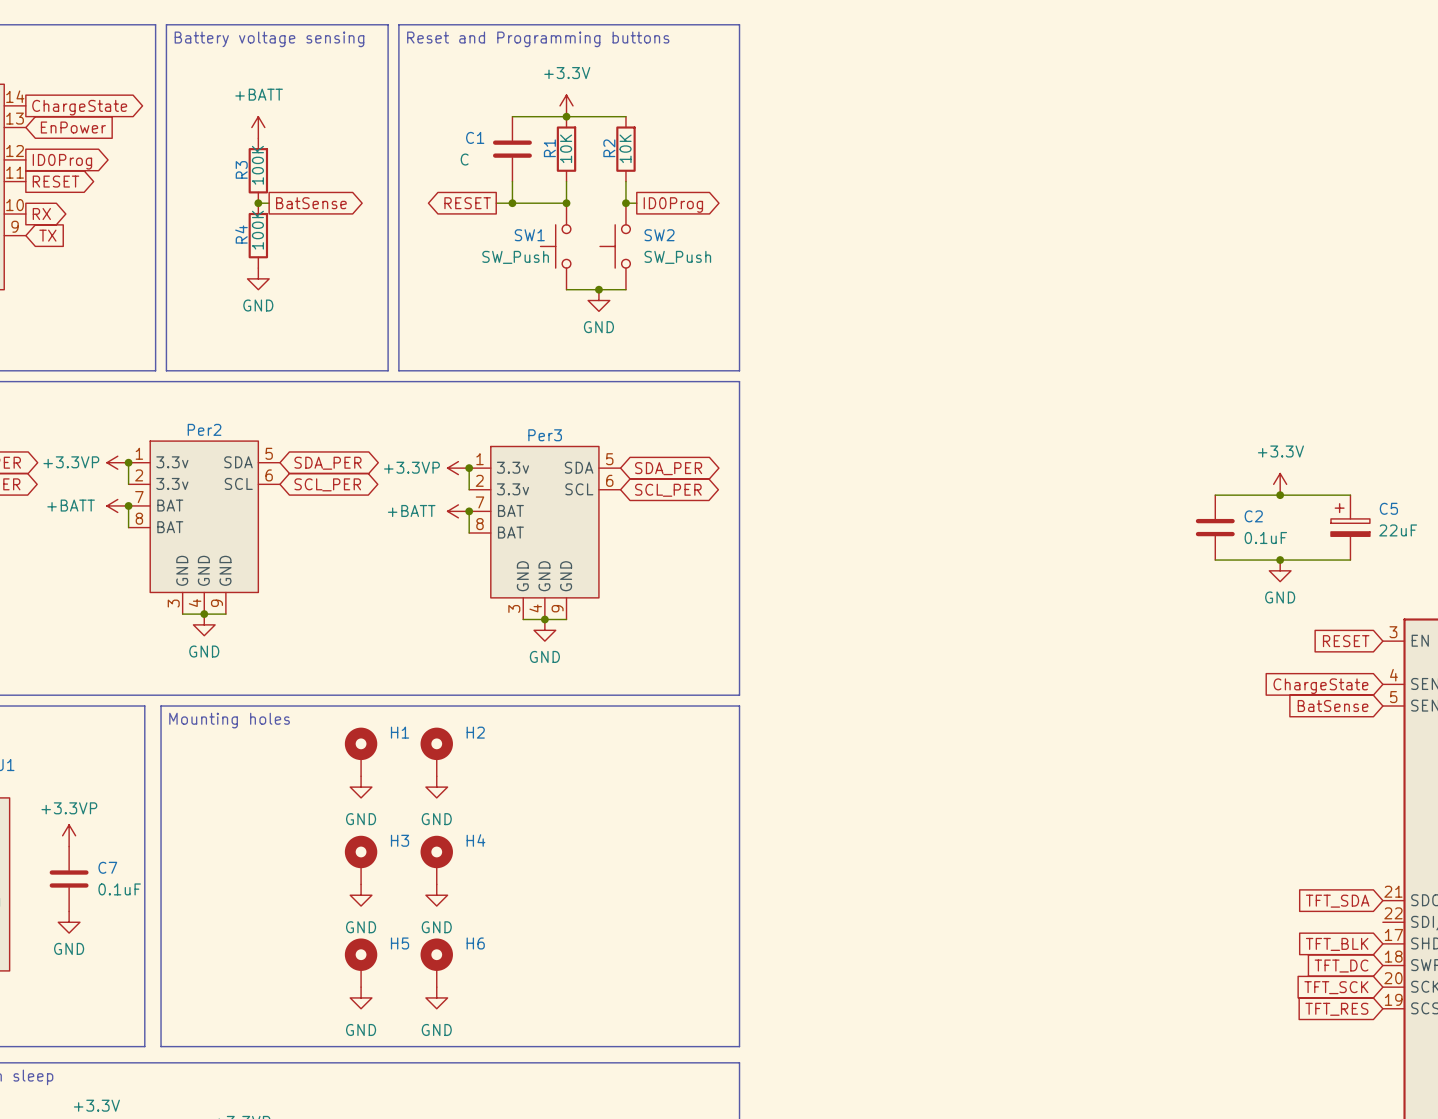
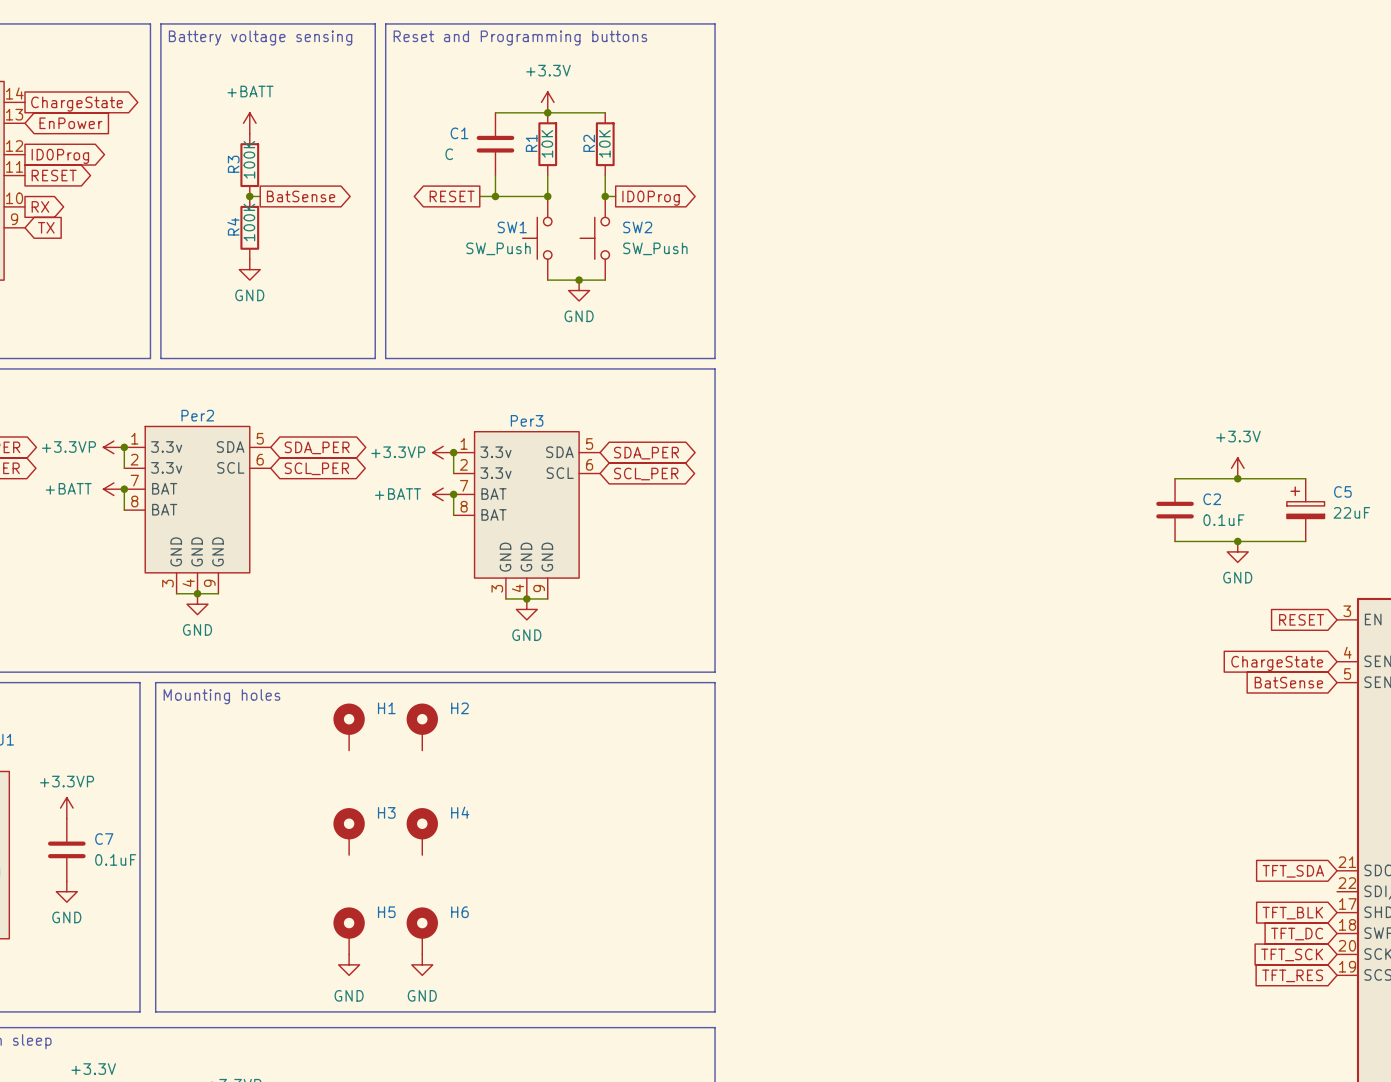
power symbol: GND (361, 787) -> none
power symbol: GND (436, 787) -> none
power symbol: GND (361, 895) -> none
power symbol: GND (436, 895) -> none

